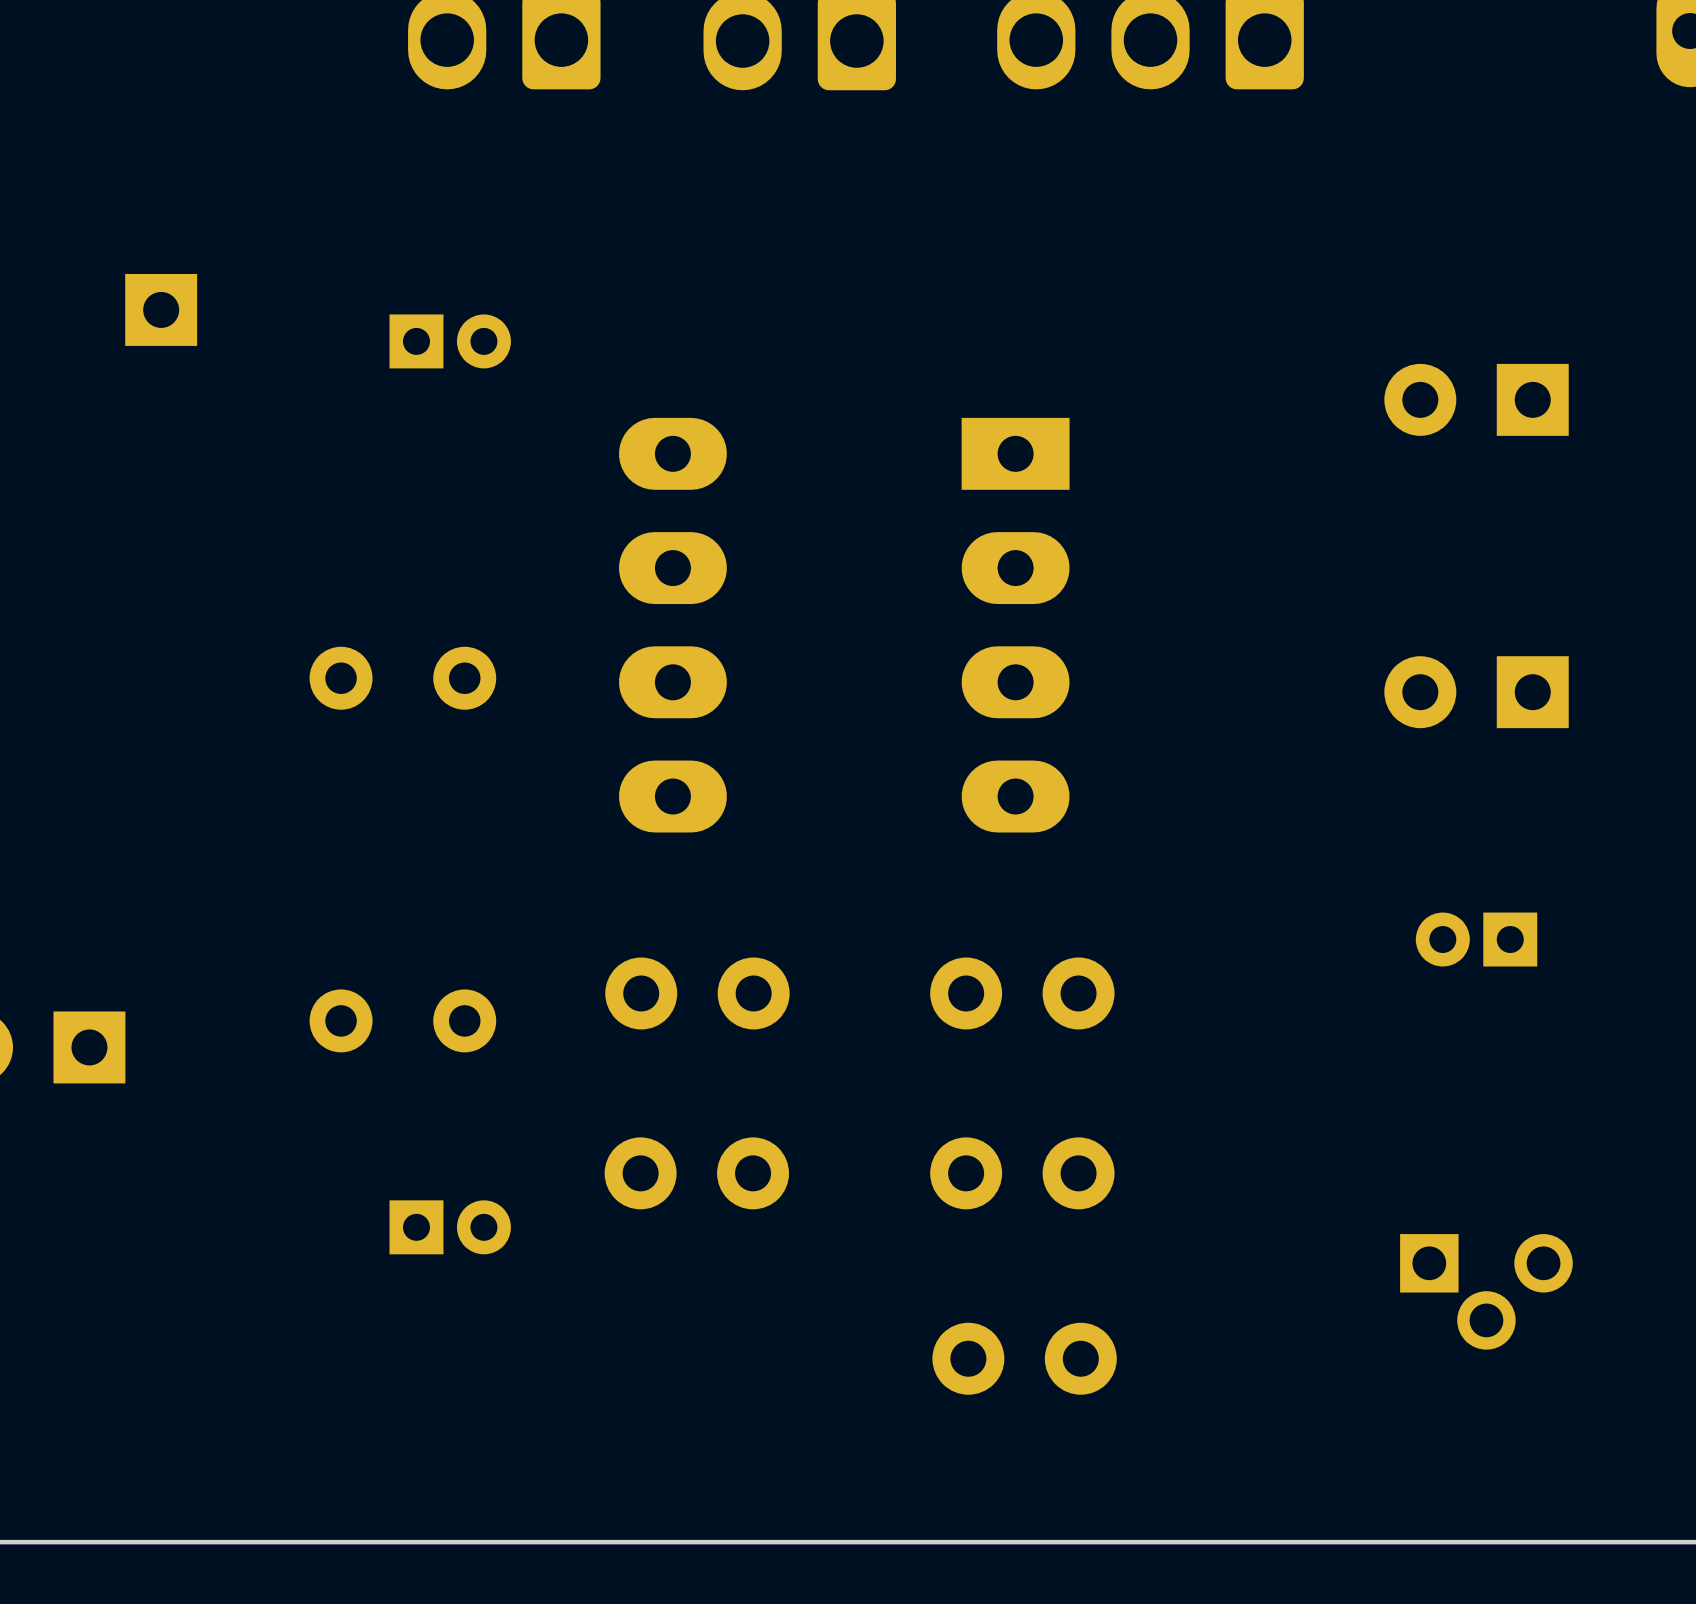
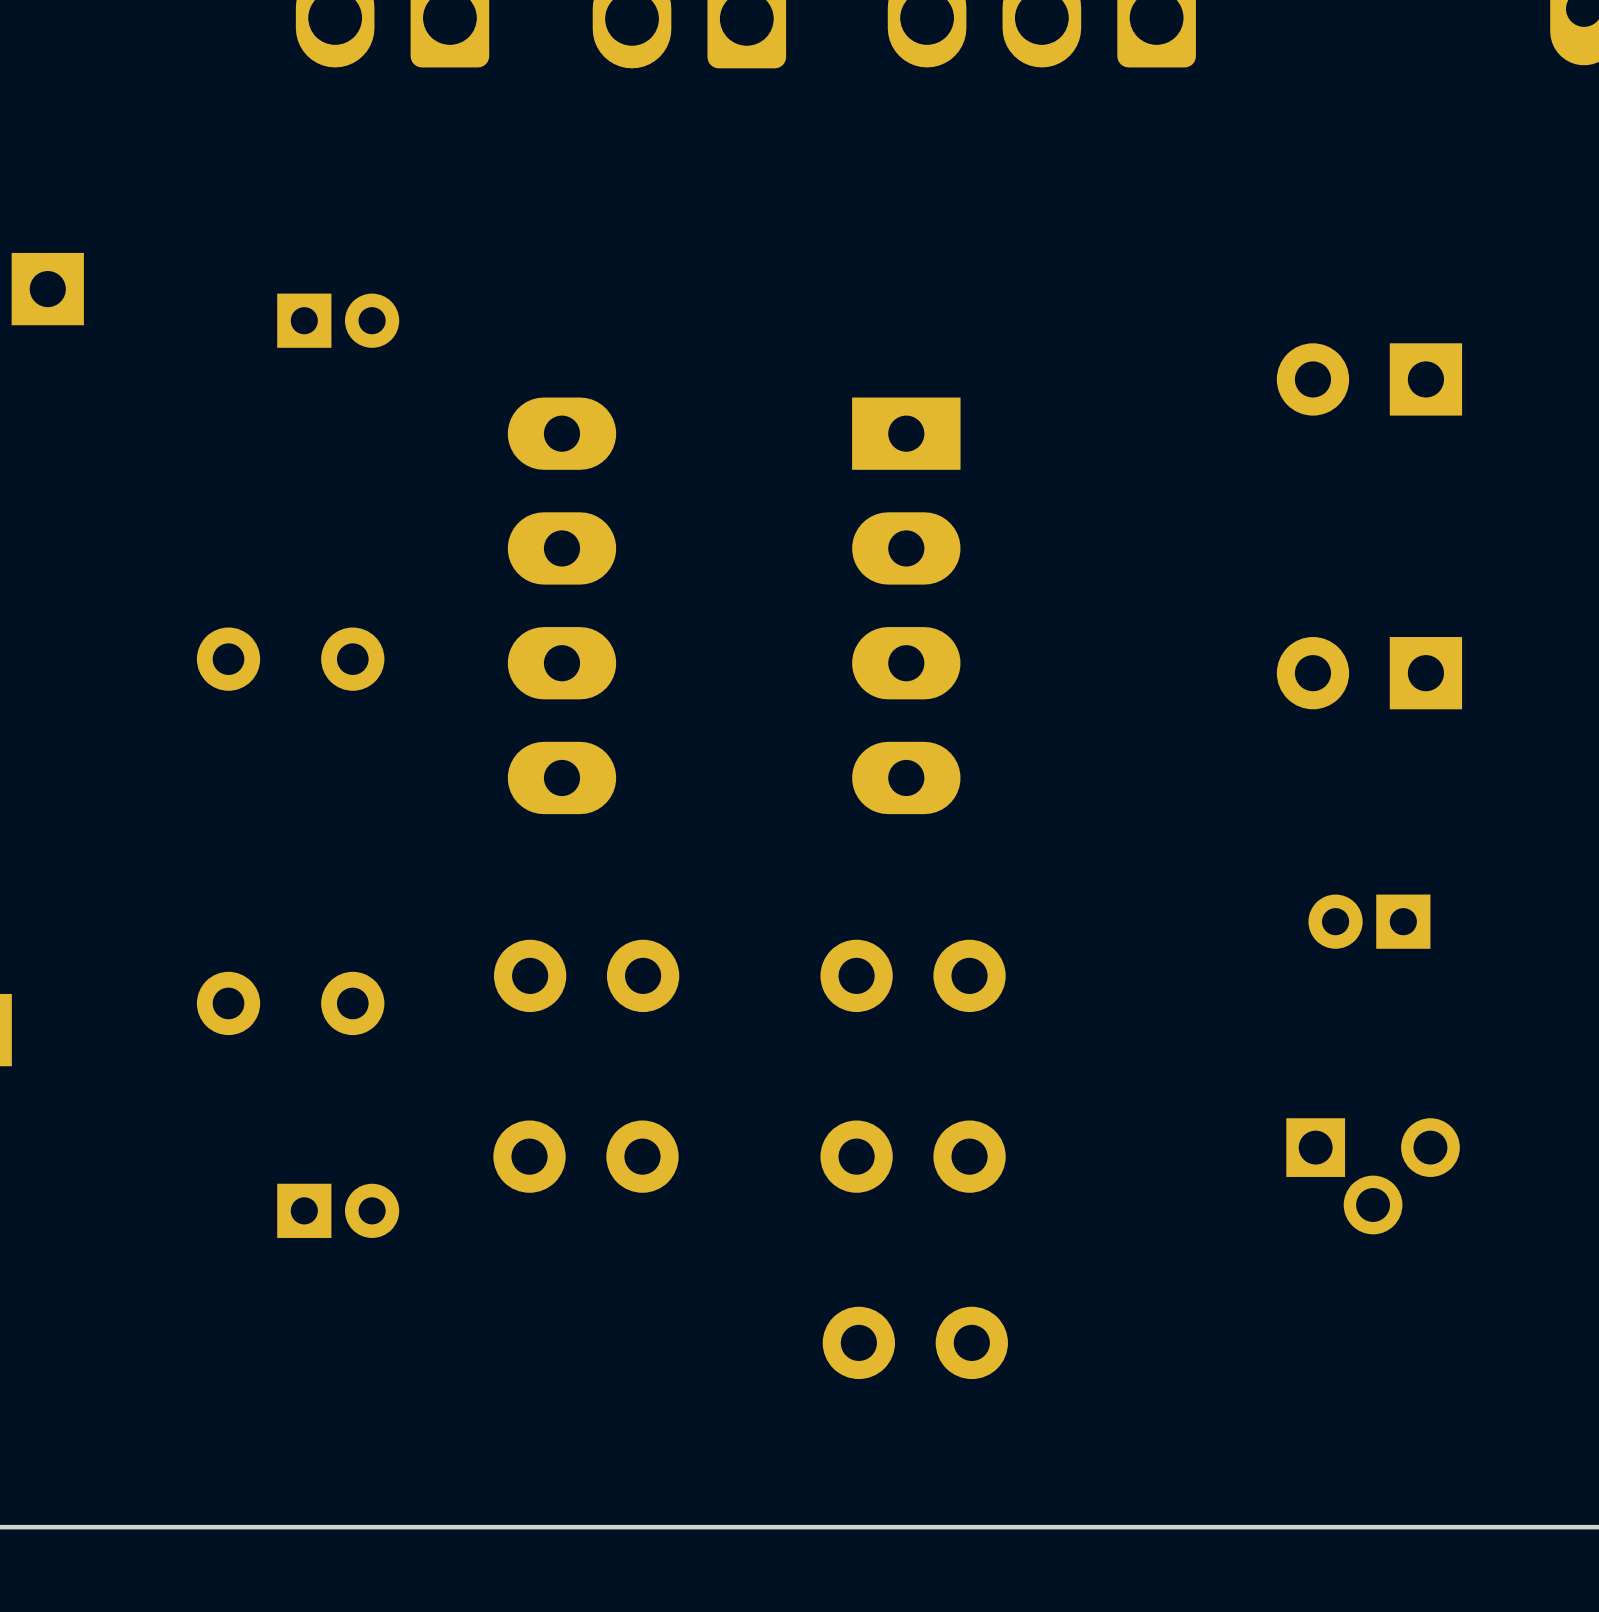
part position: (1486, 1291) -> (1373, 1176)

